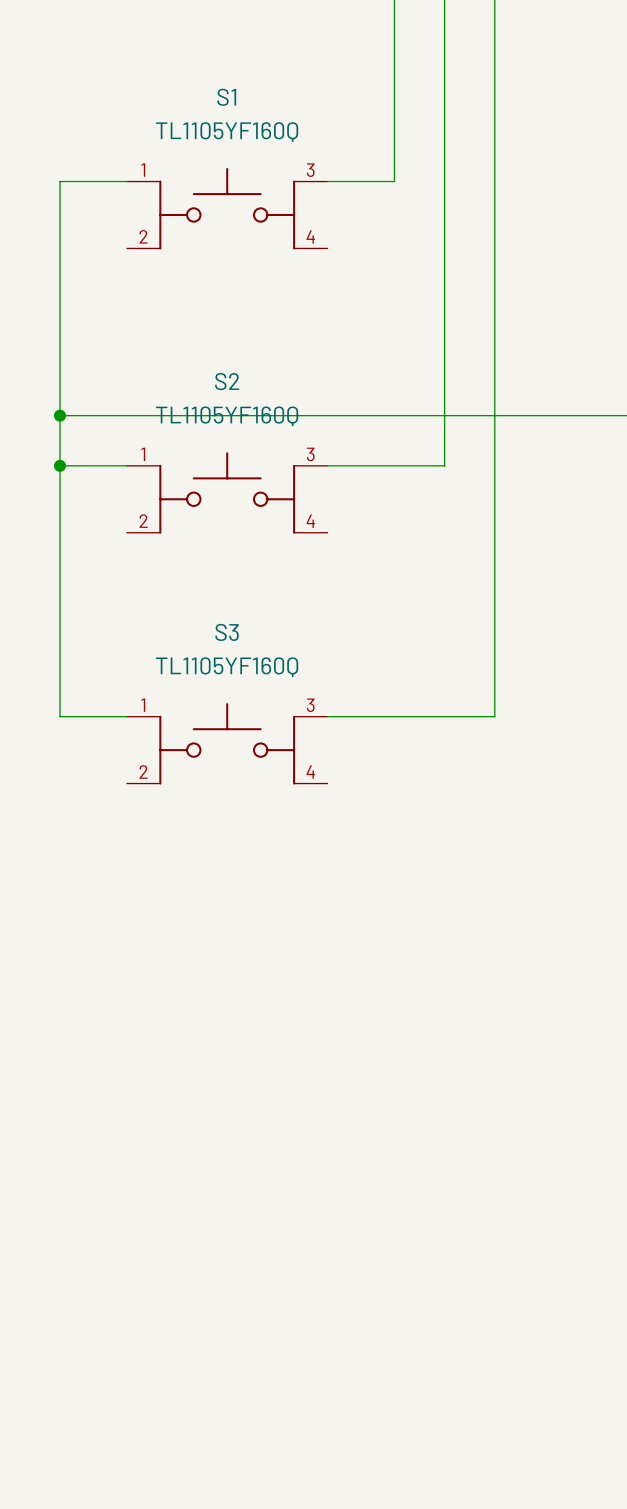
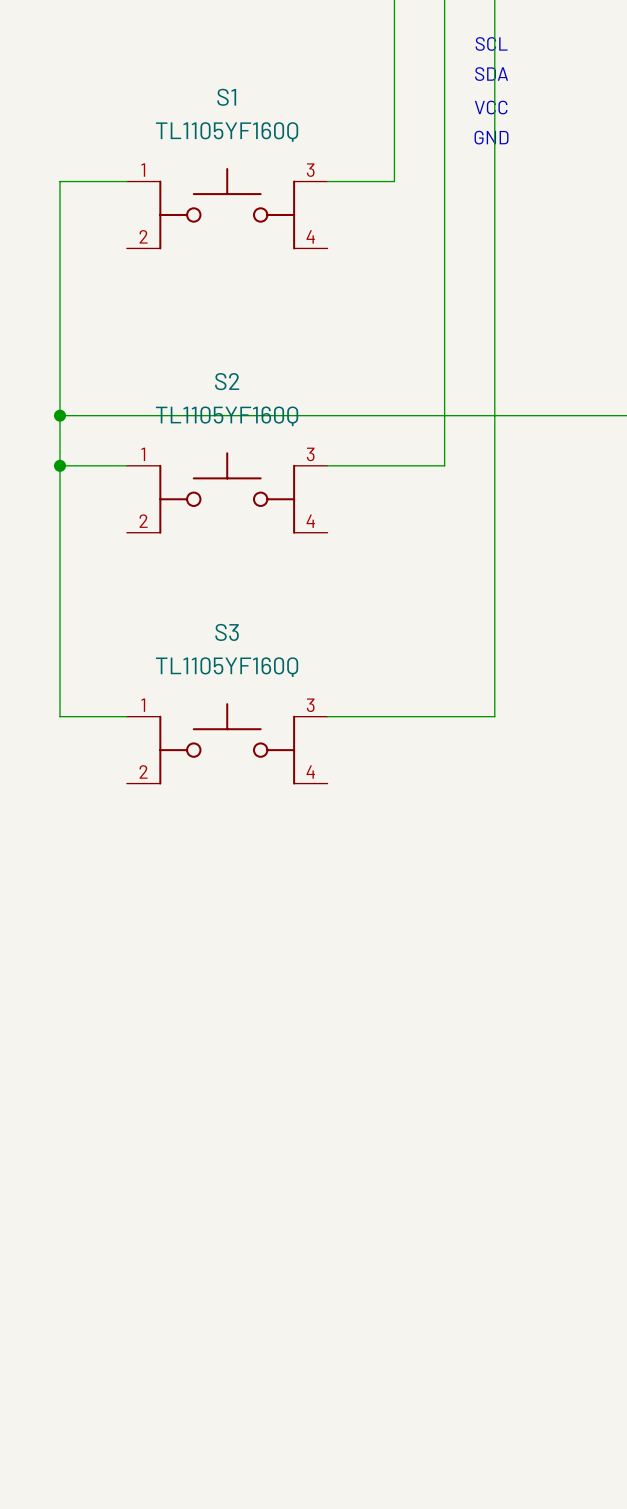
text: none -> SCL (491, 43)
text: none -> SDA (491, 74)
text: none -> VCC (491, 107)
text: none -> GND (491, 137)

